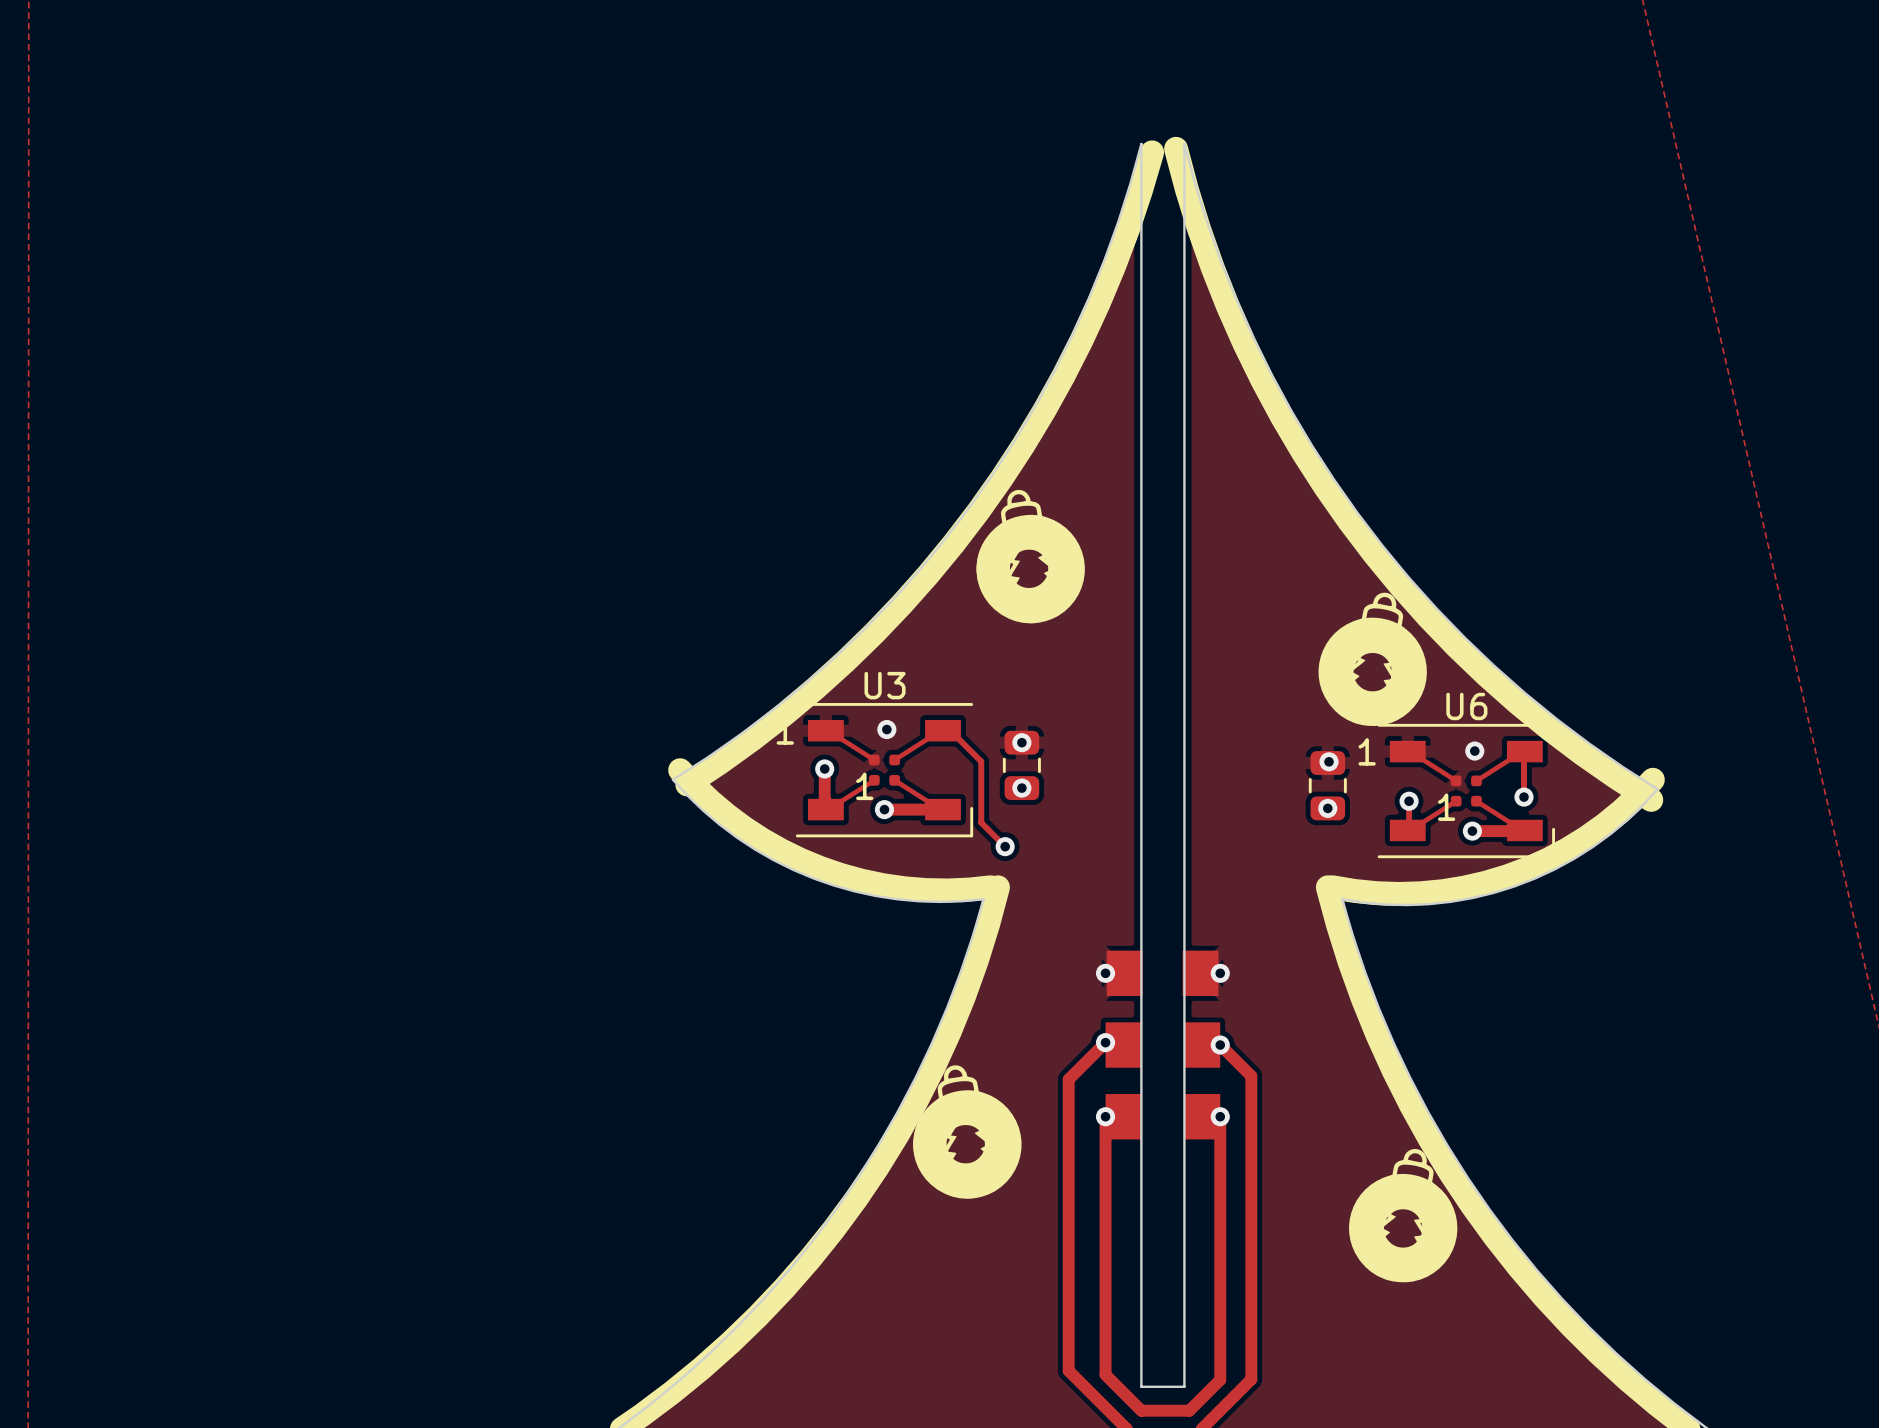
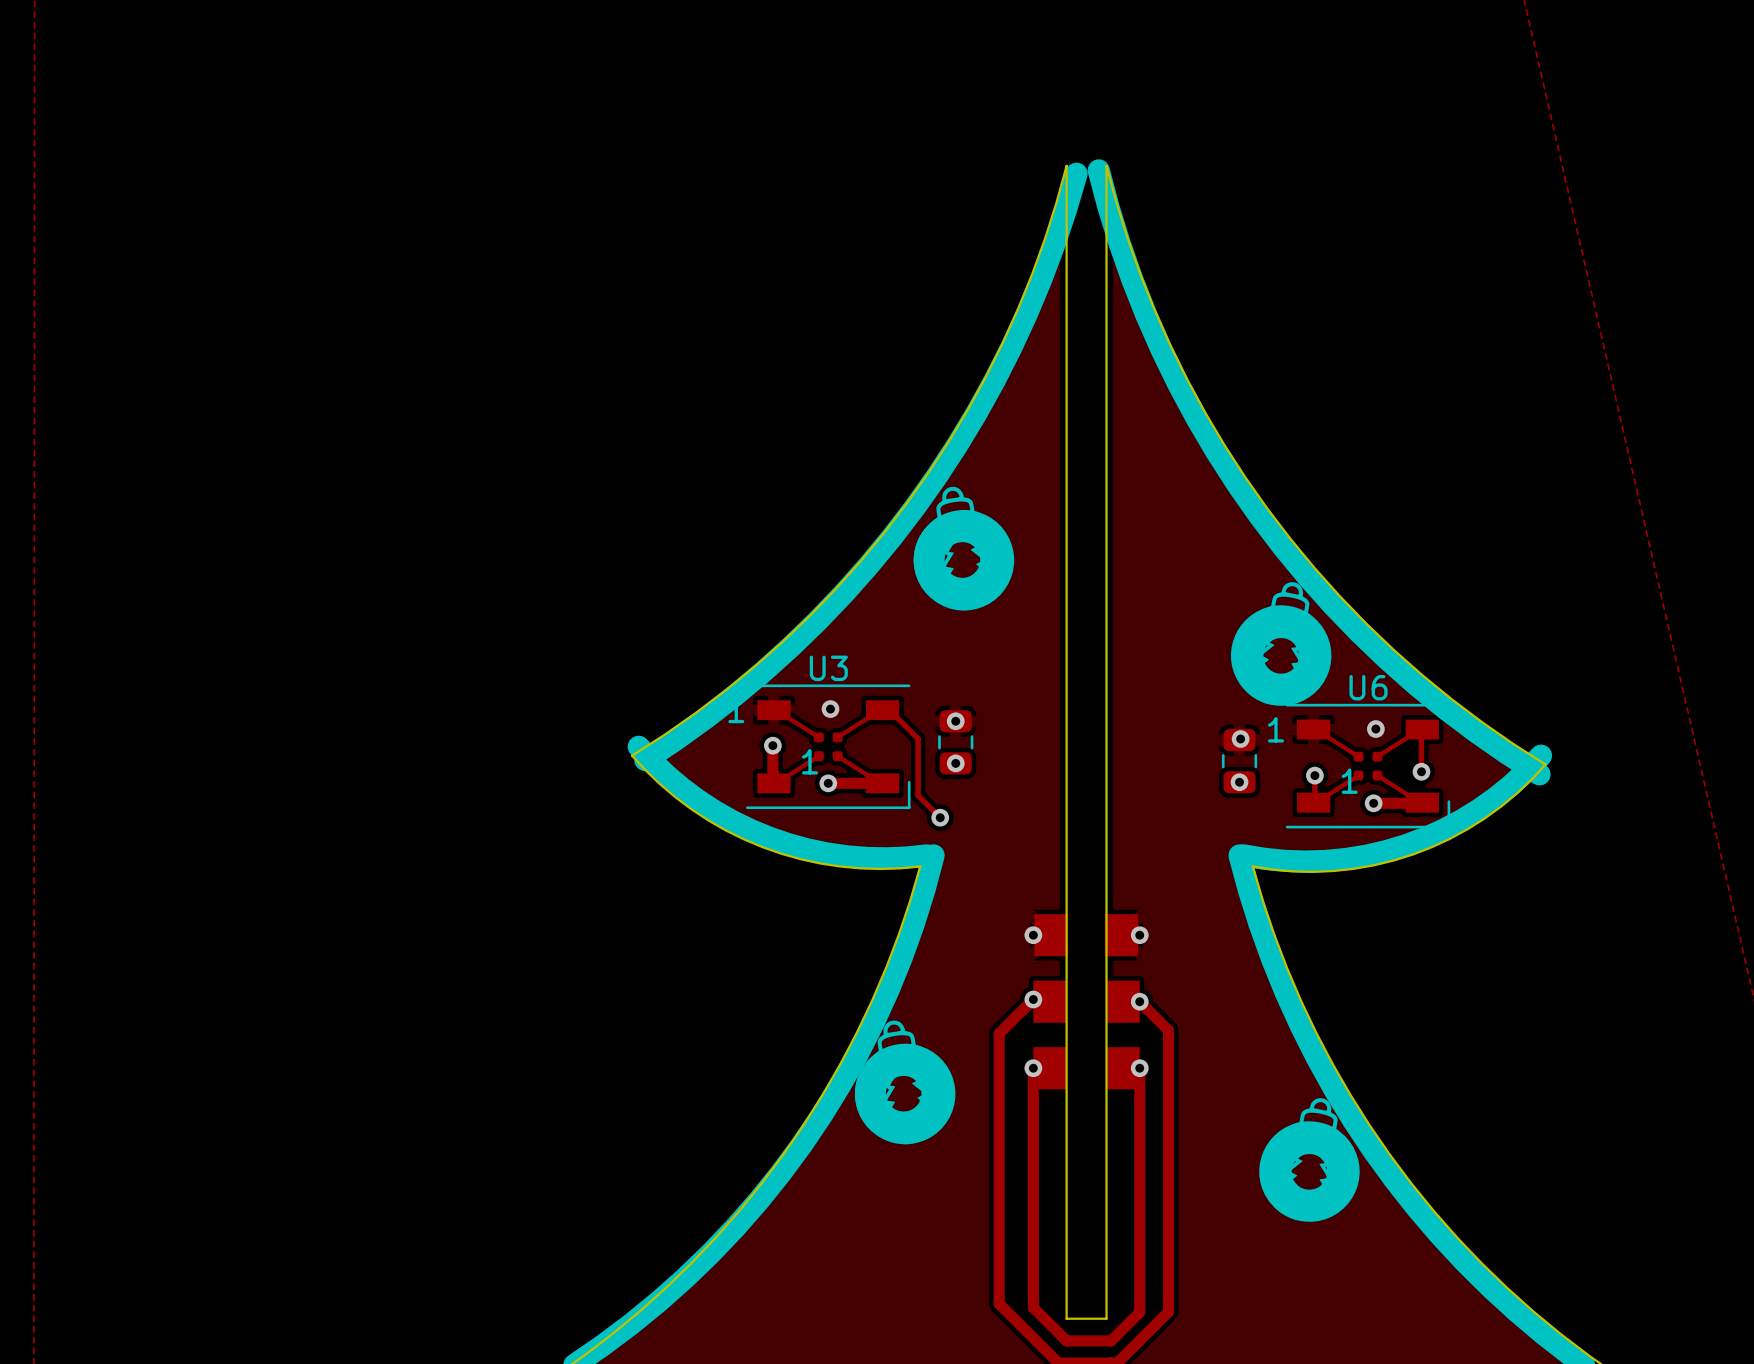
U3 footprint: [795, 703, 974, 838] -> [746, 684, 911, 810]
U6 footprint: [1377, 723, 1555, 859] -> [1285, 703, 1451, 829]

